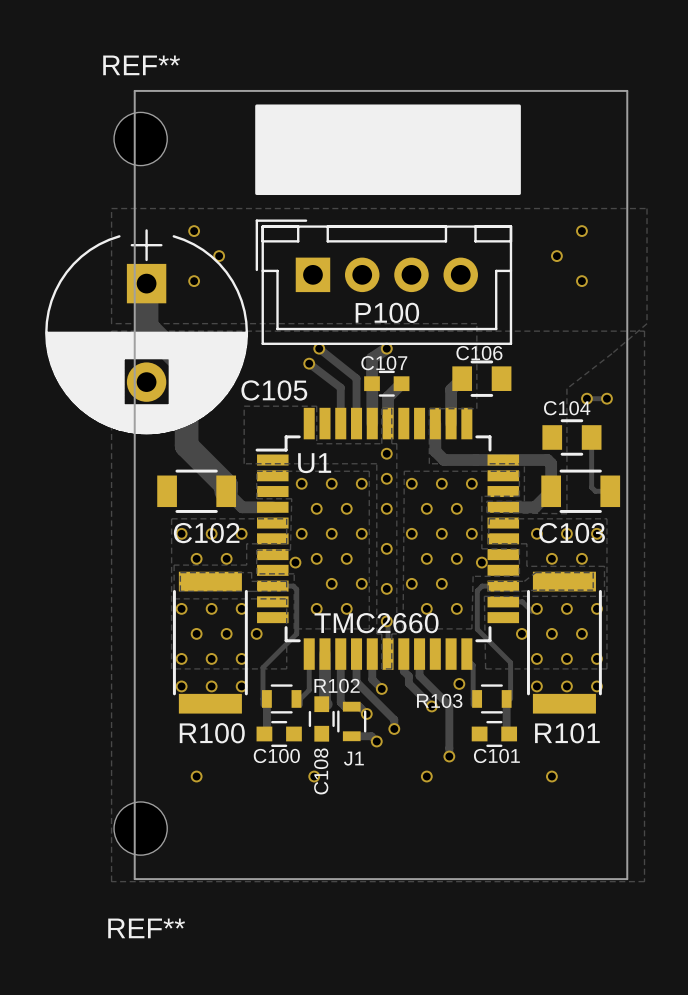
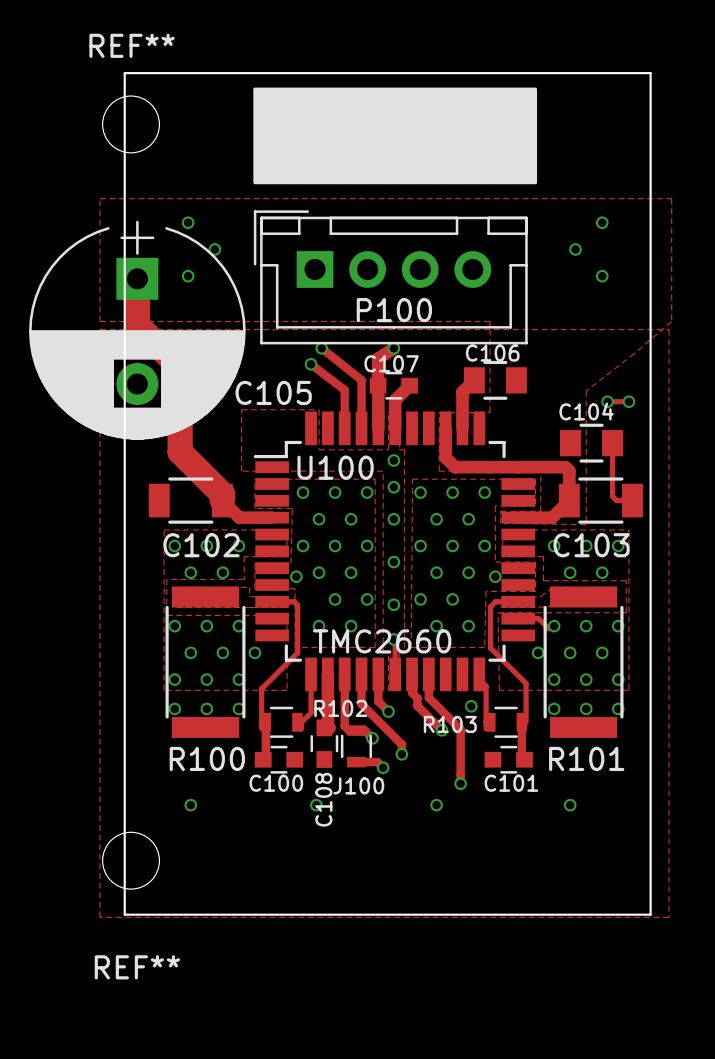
U1 name: U1 (314, 463) -> U100 (335, 467)
J1 name: J1 (353, 758) -> J100 (358, 785)

